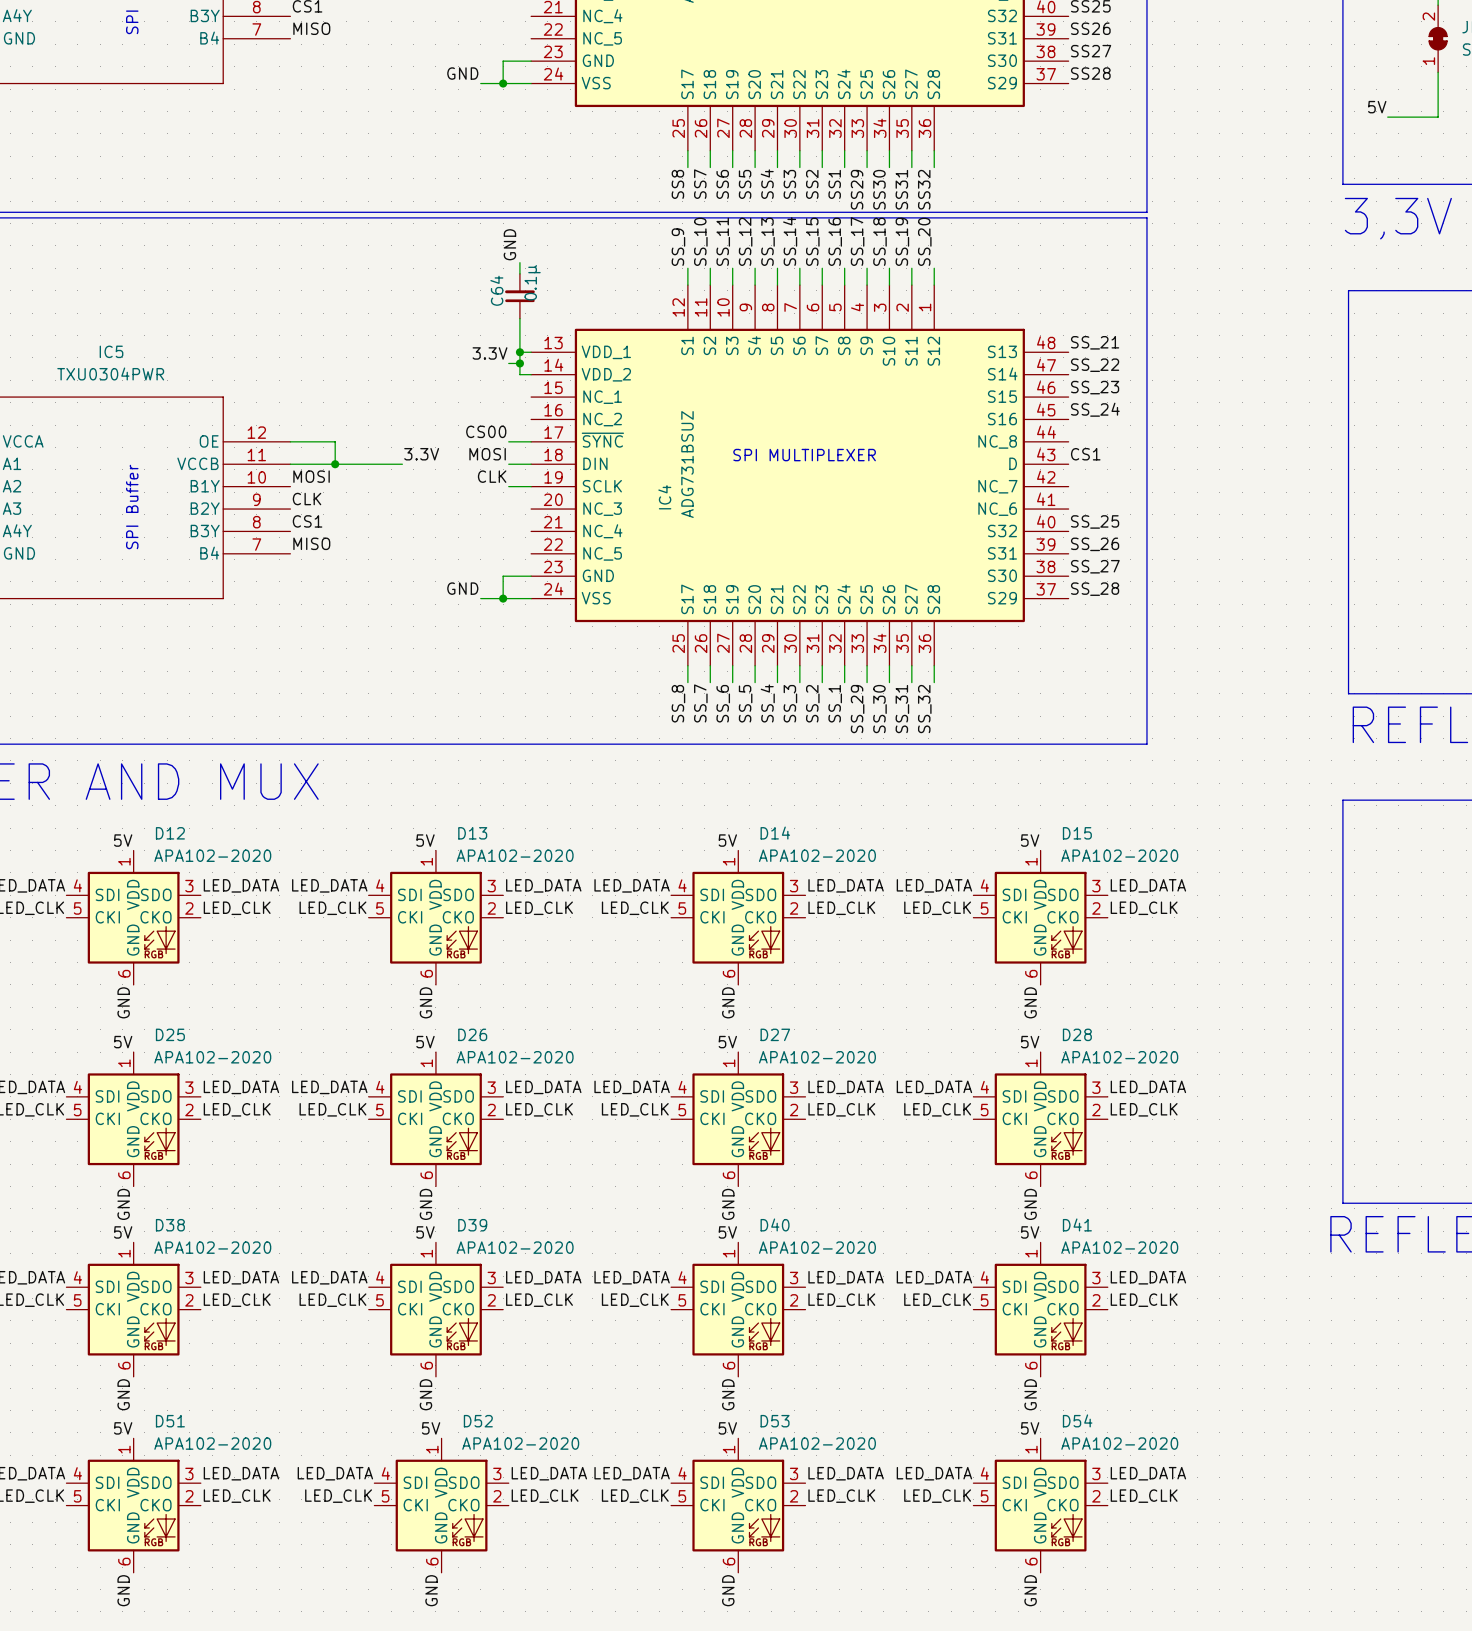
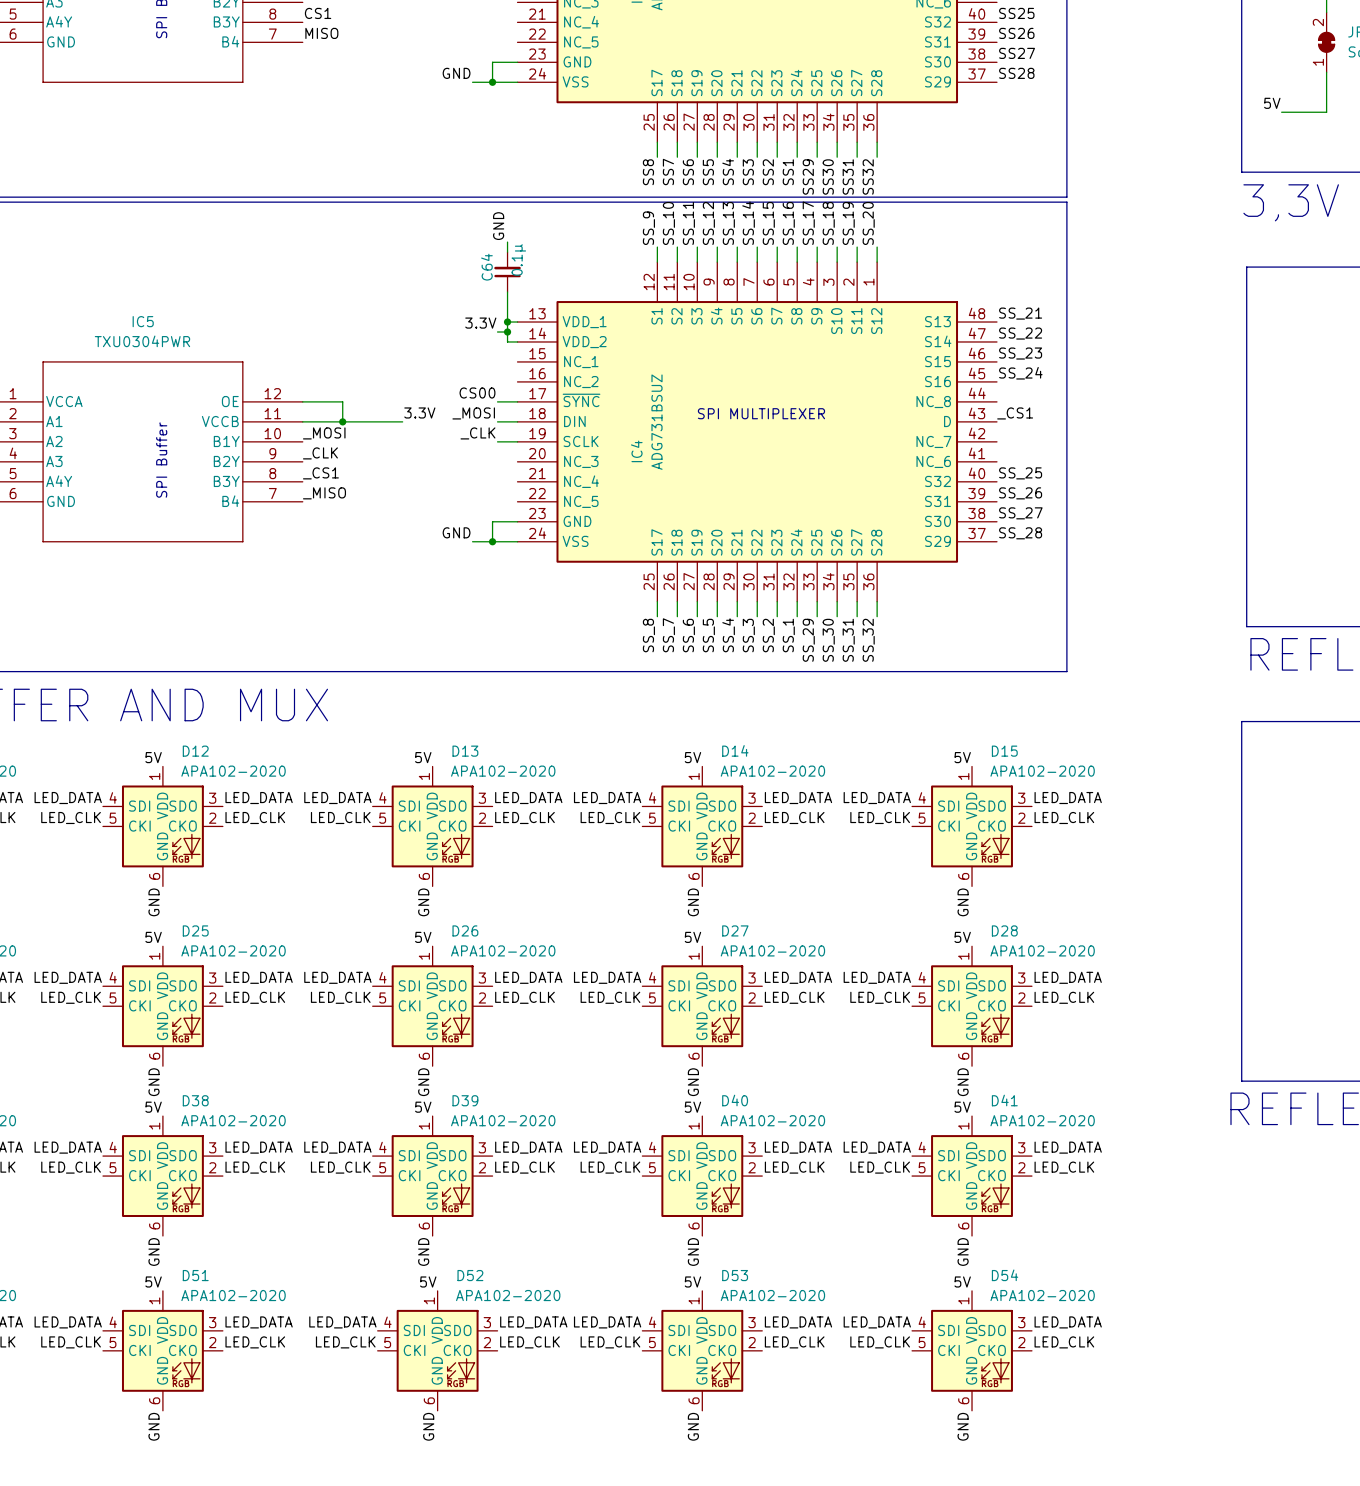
label: MOSI (487, 454) -> _MOSI (473, 413)
label: CS1 (1085, 454) -> _CS1 (1015, 413)
label: MOSI (311, 476) -> _MOSI (324, 433)
label: CLK (492, 476) -> _CLK (477, 433)
label: CLK (307, 499) -> _CLK (320, 453)
label: CS1 (307, 521) -> _CS1 (320, 473)
label: MISO (311, 543) -> _MISO (324, 493)

